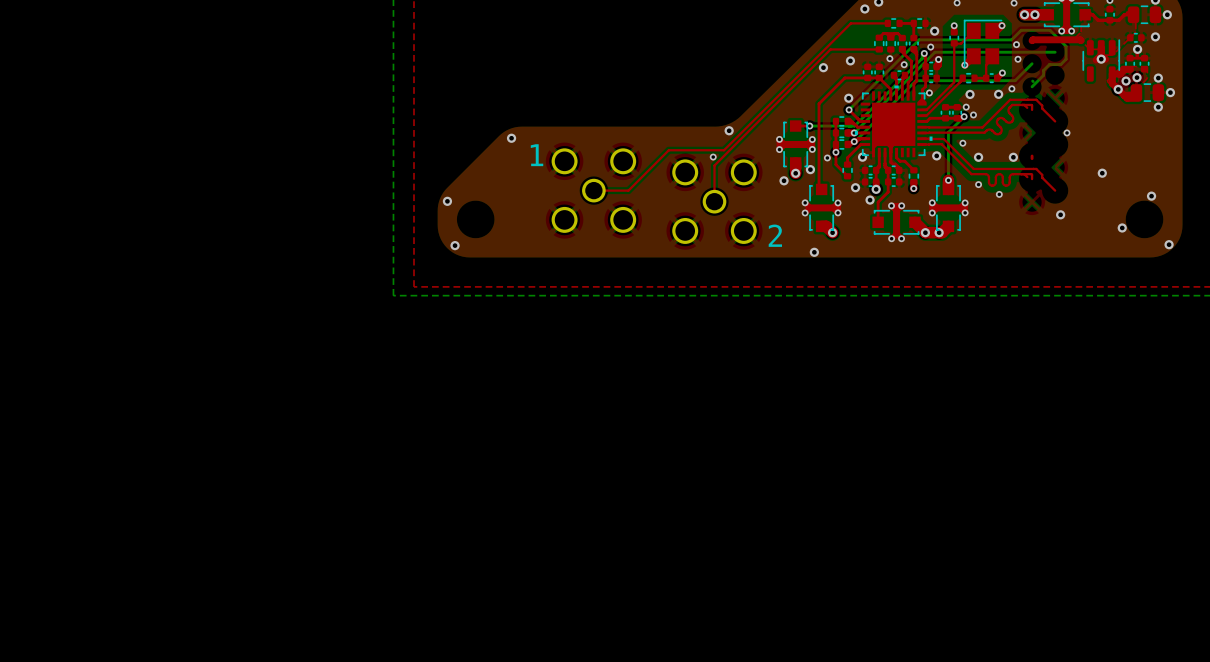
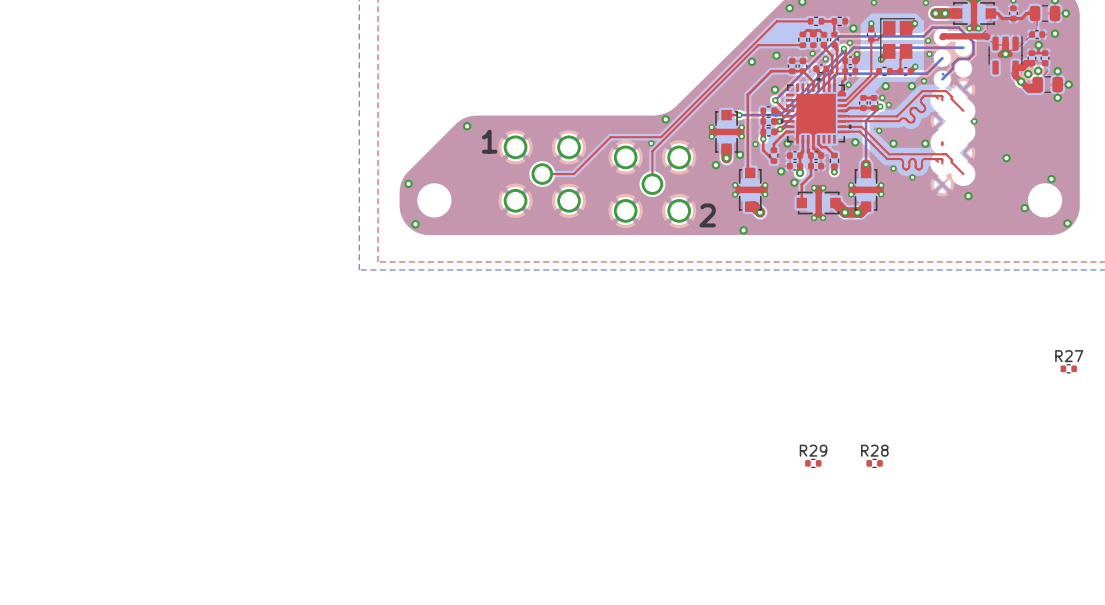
R27: none -> (1068, 368)
R29: none -> (813, 463)
R28: none -> (874, 463)

